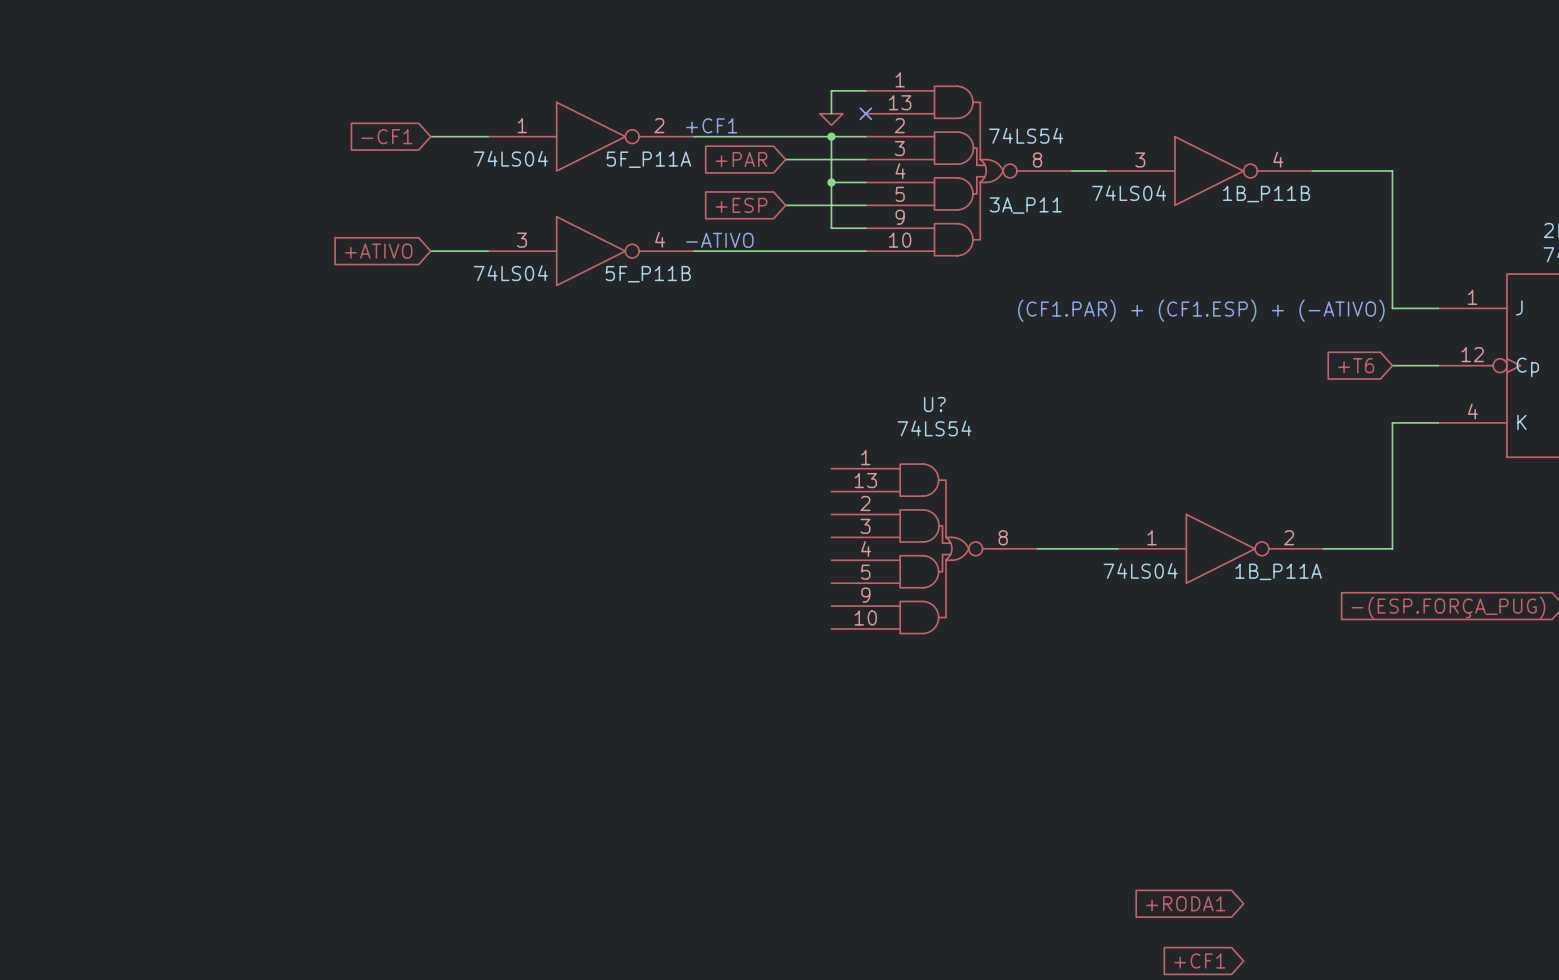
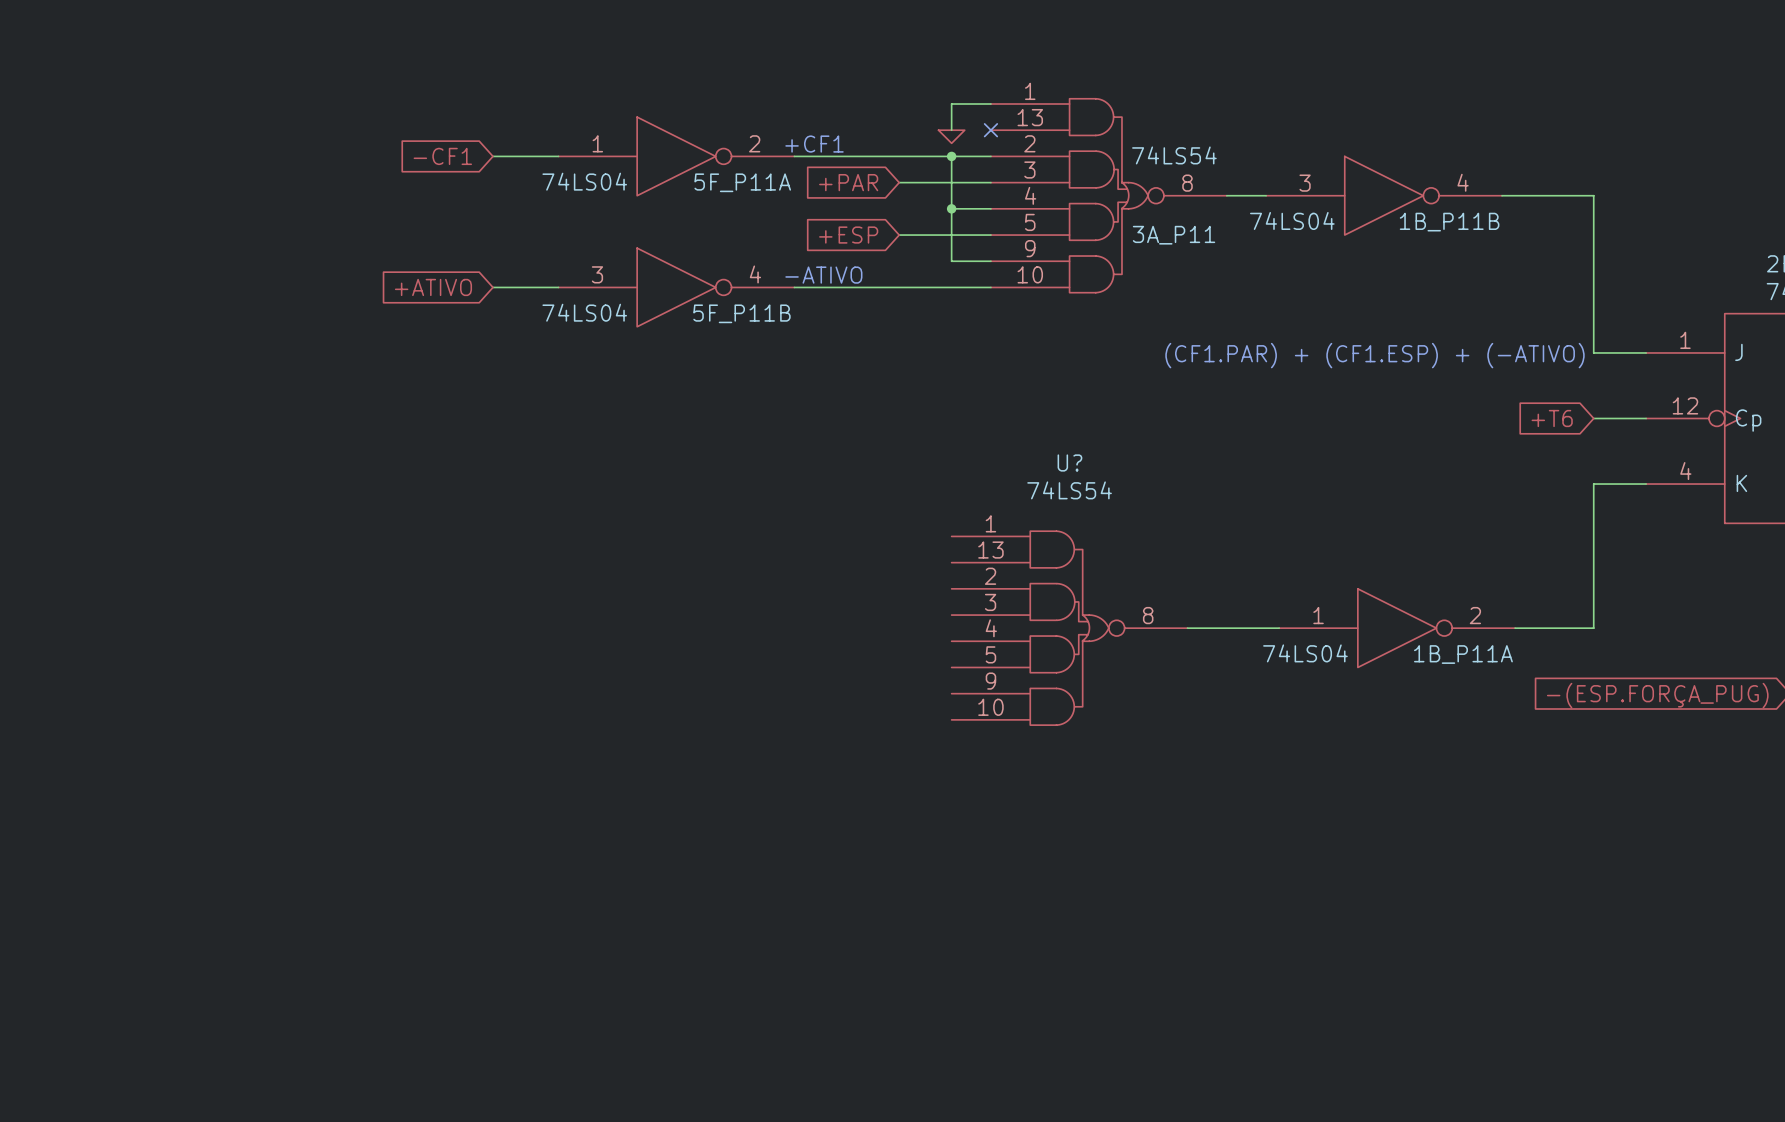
global label: +RODA1 (1185, 903) -> none
global label: +CF1 (1199, 961) -> none

